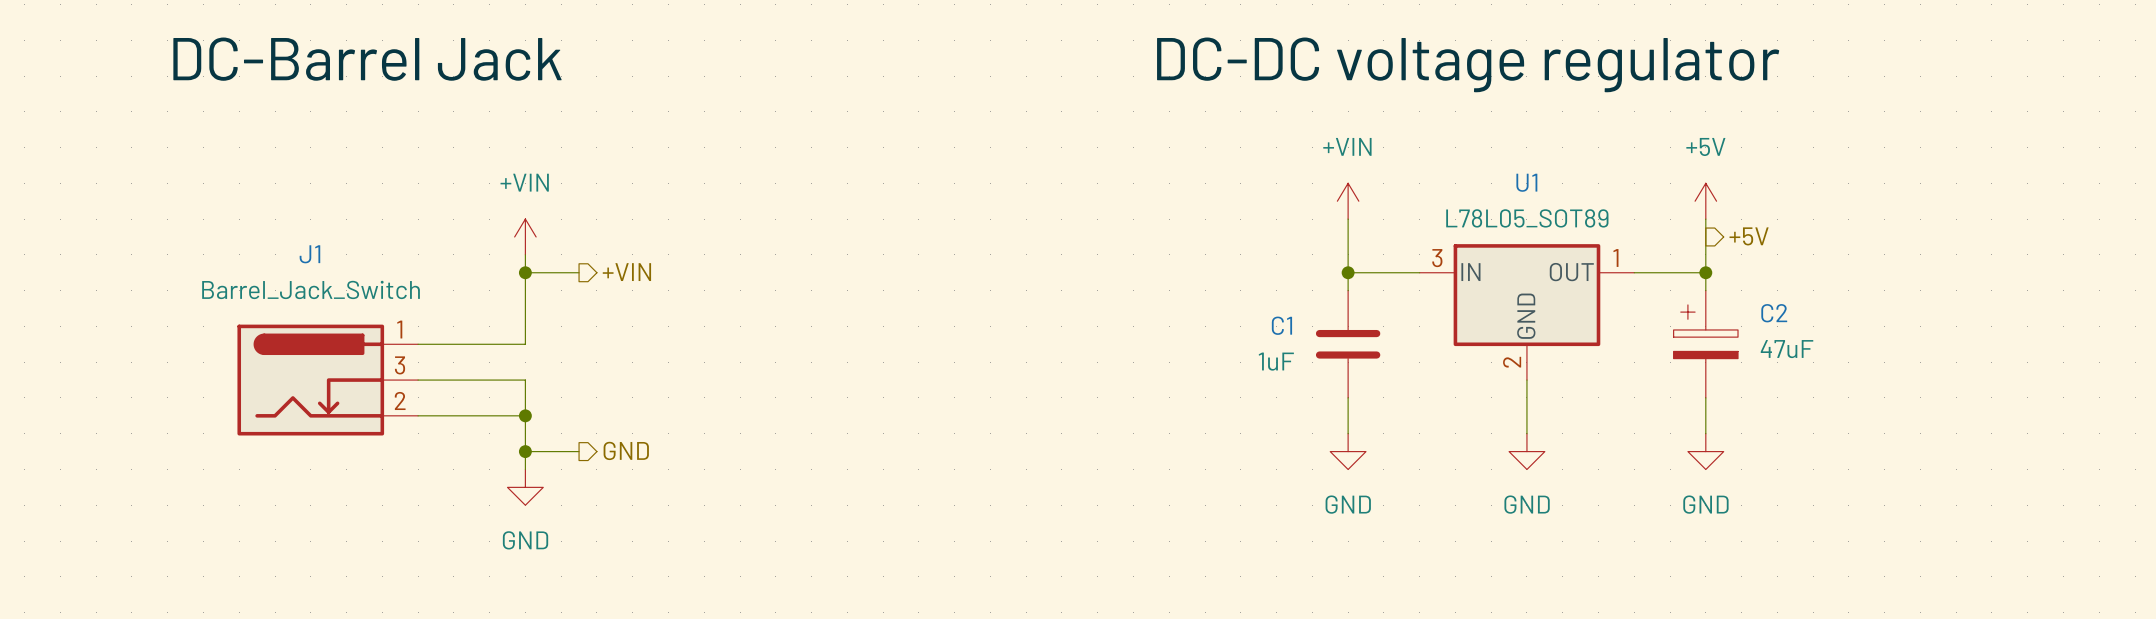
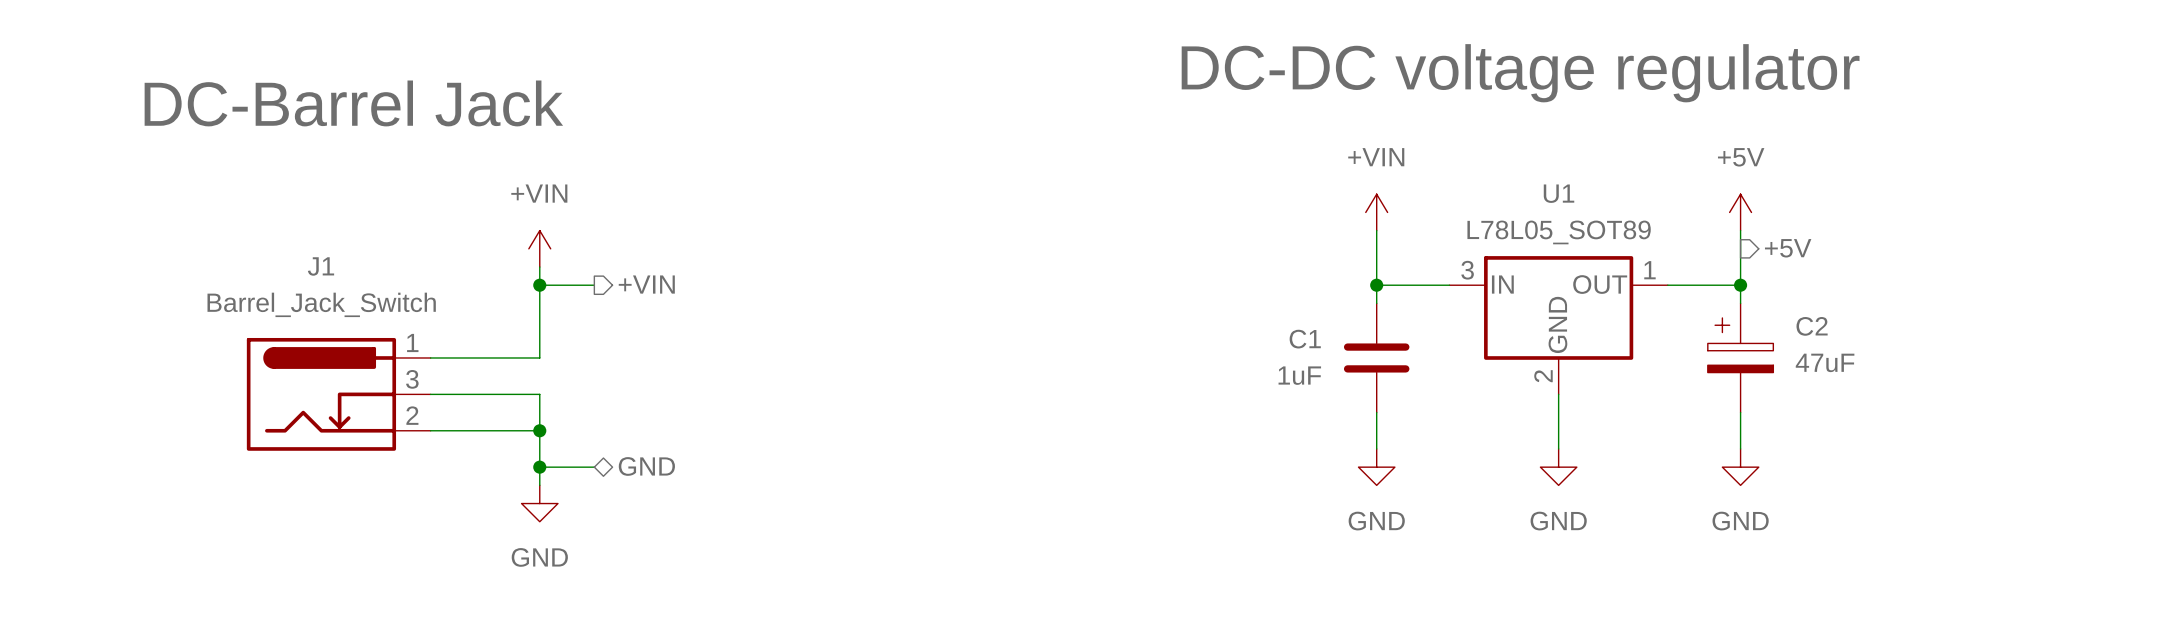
label position: DC-Barrel Jack (367, 59) -> DC-Barrel Jack (353, 103)
hierarchical label shape: output (626, 450) -> bidirectional (646, 466)

